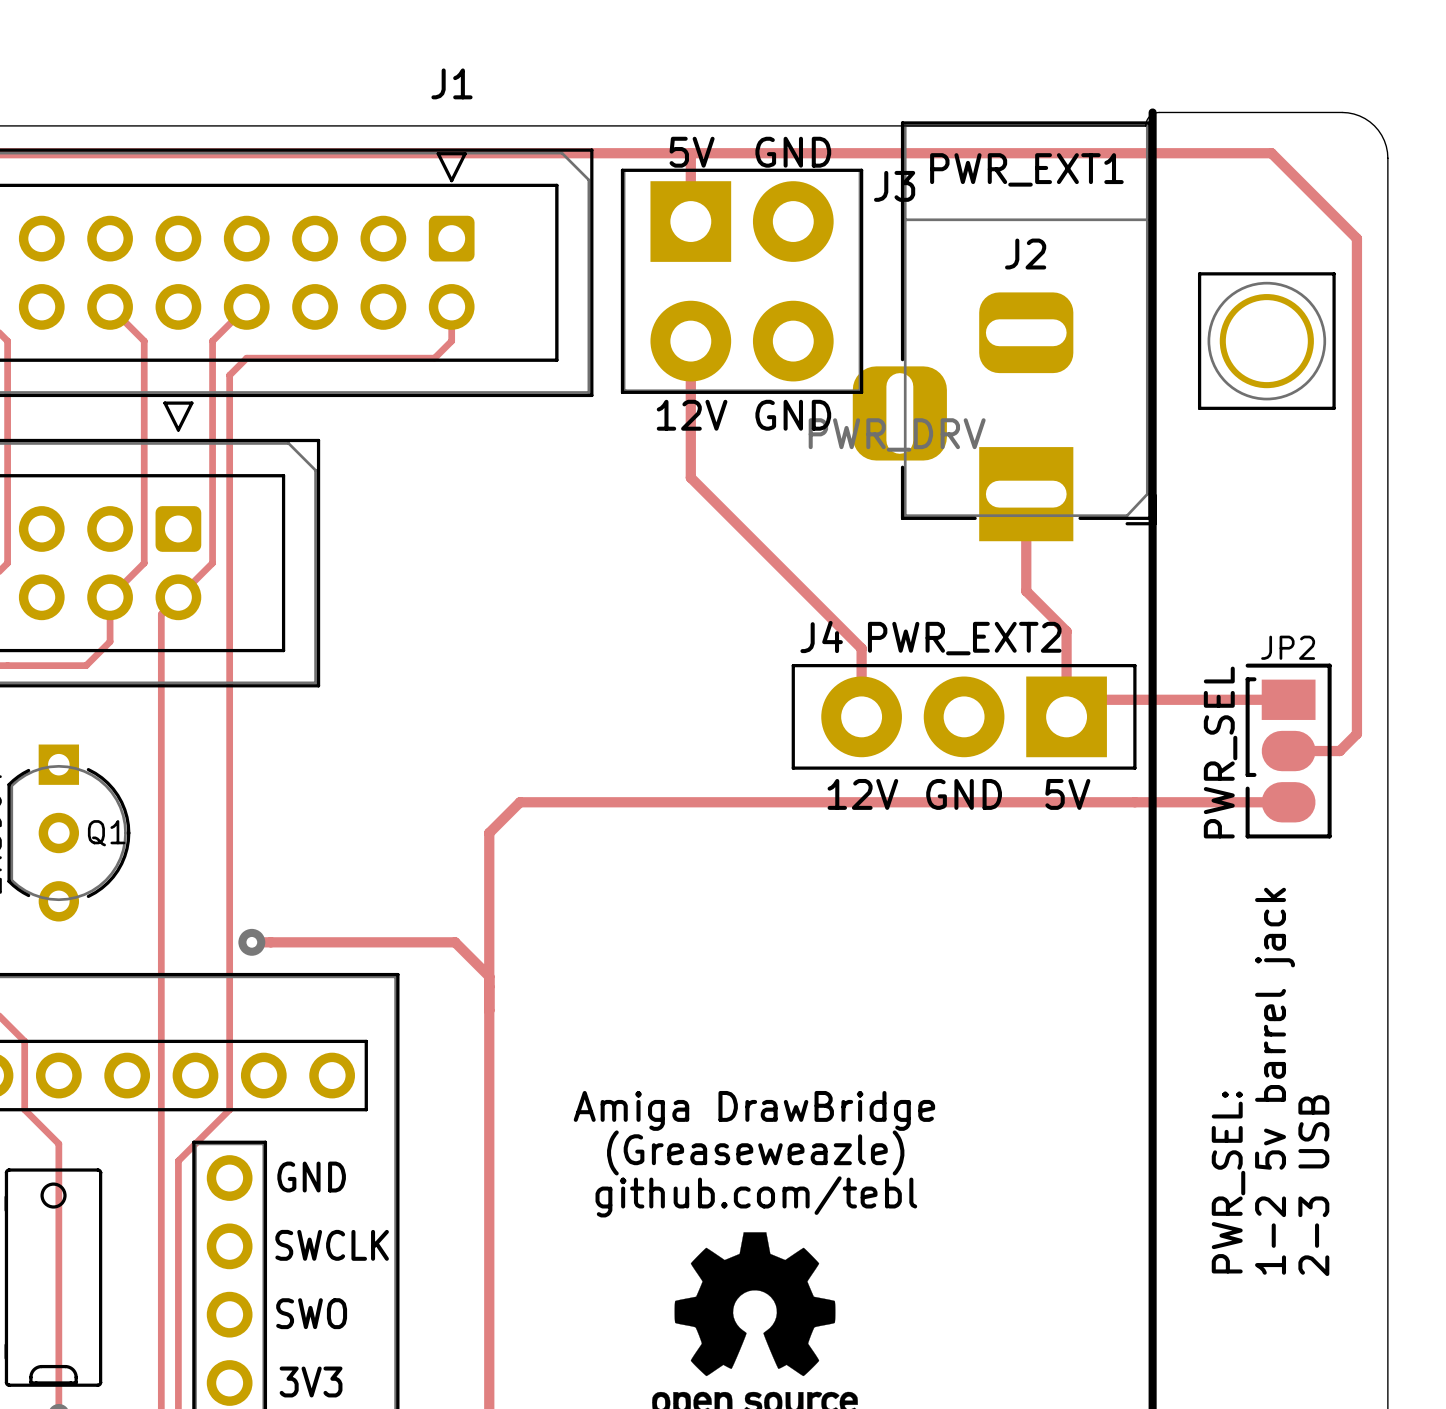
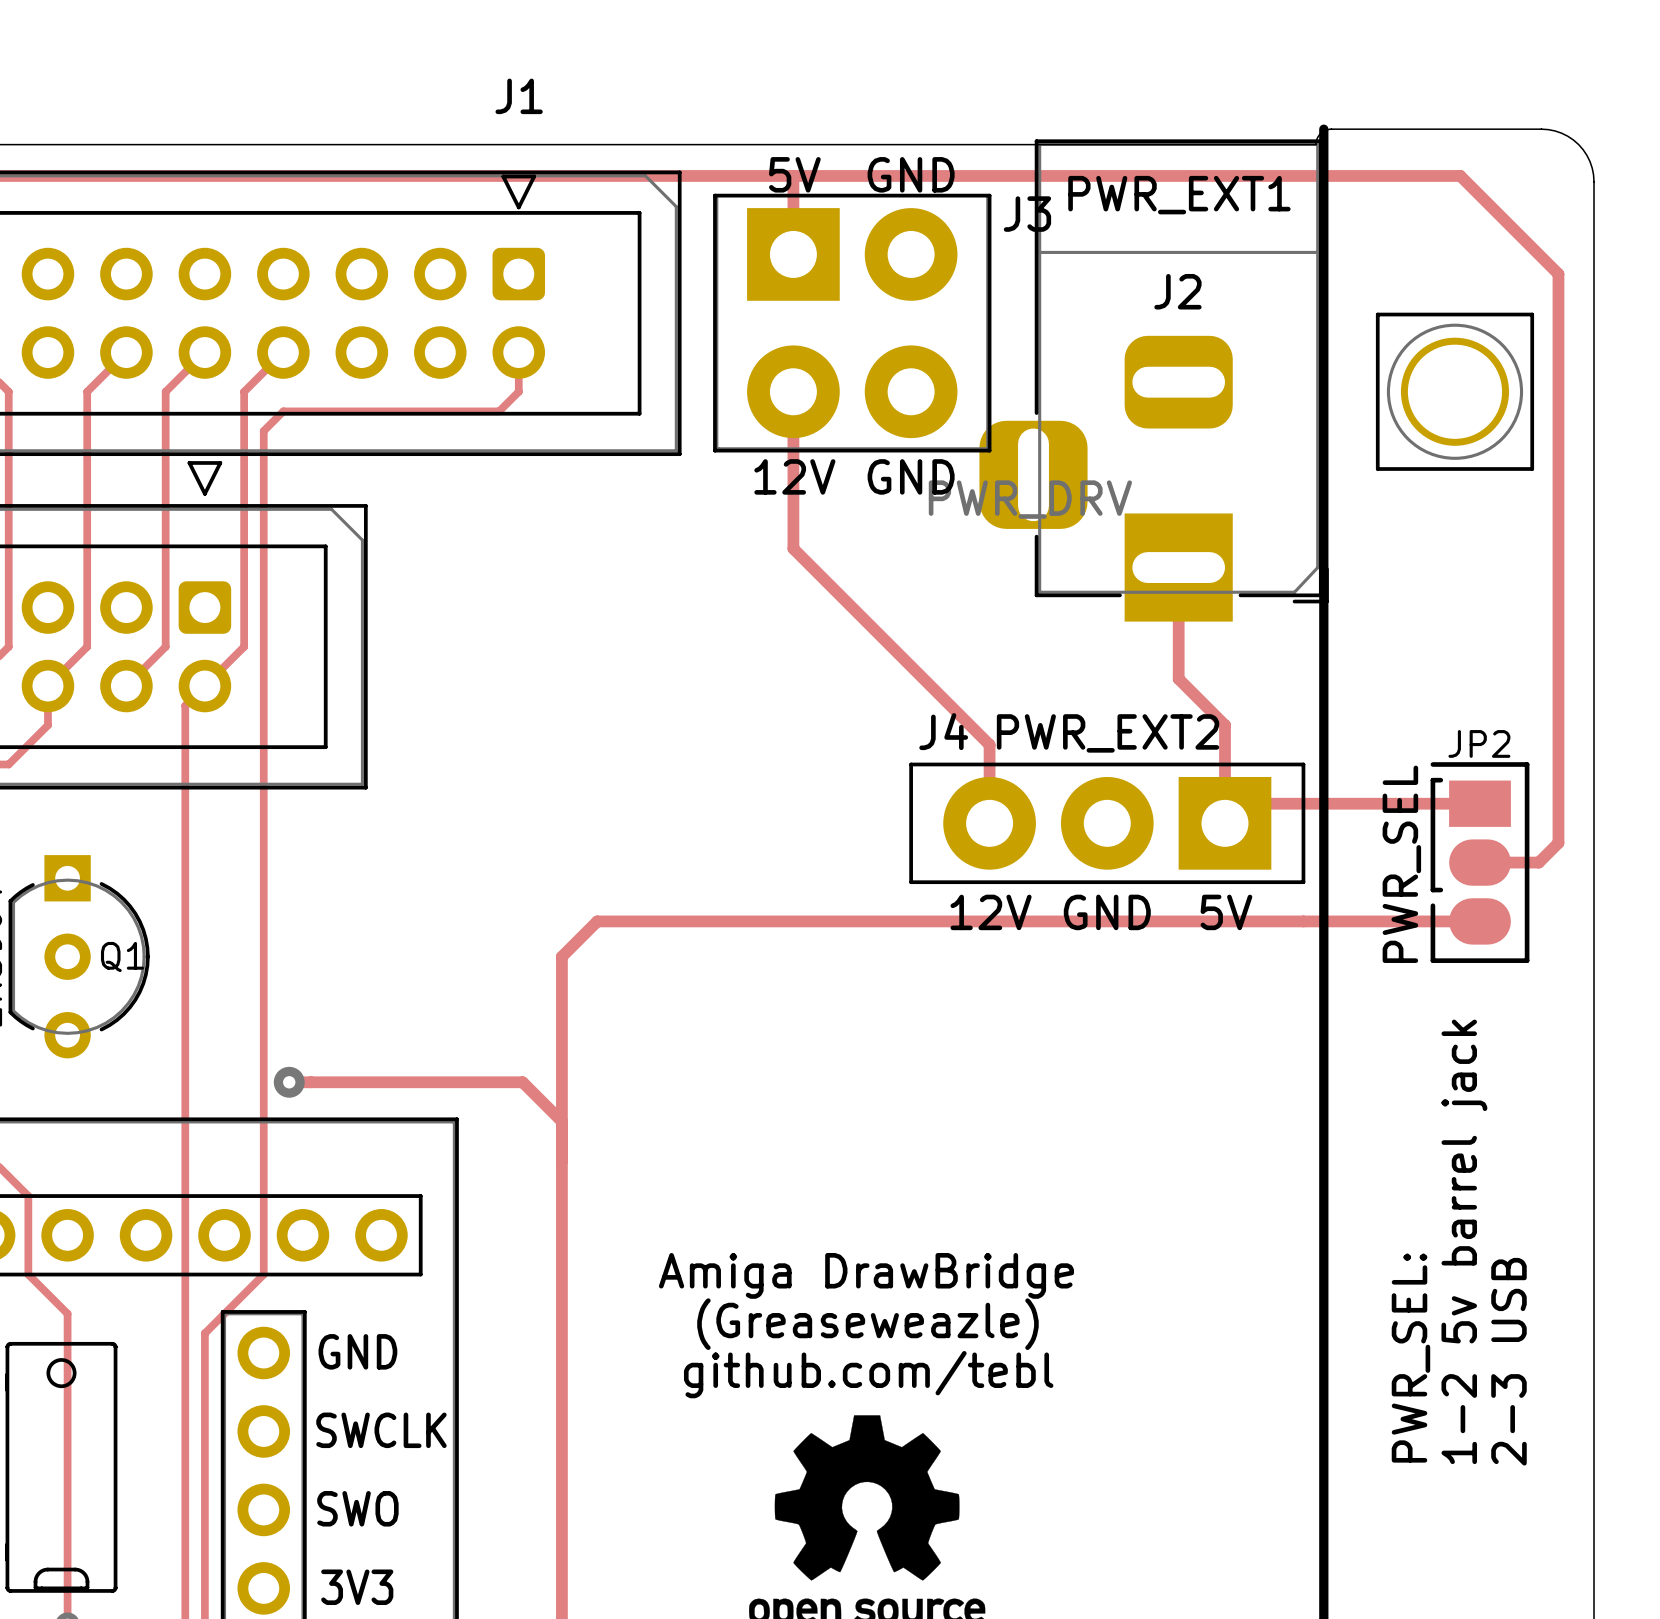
track: (110, 306) (144, 341) -> (204, 352) (165, 391)
track: (110, 597) (110, 641) (86, 665) (7, 665) -> (126, 352) (87, 391) (87, 646) (47, 686) (47, 725) (8, 764)

